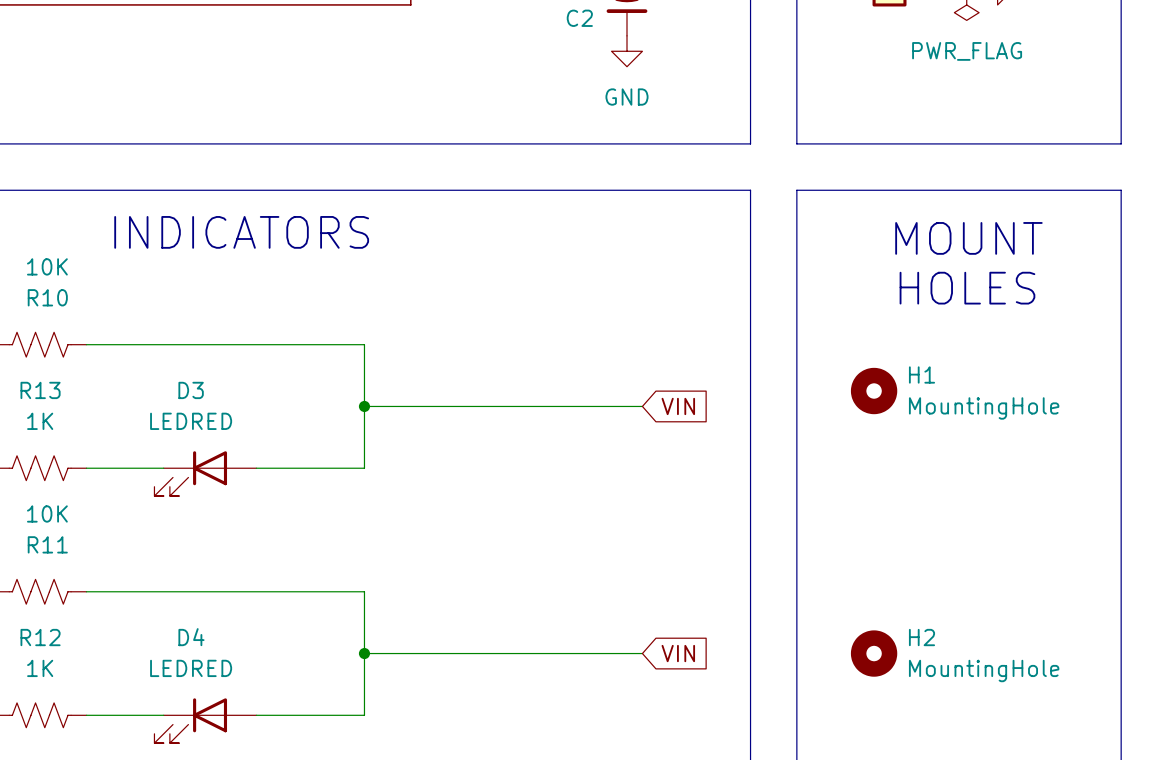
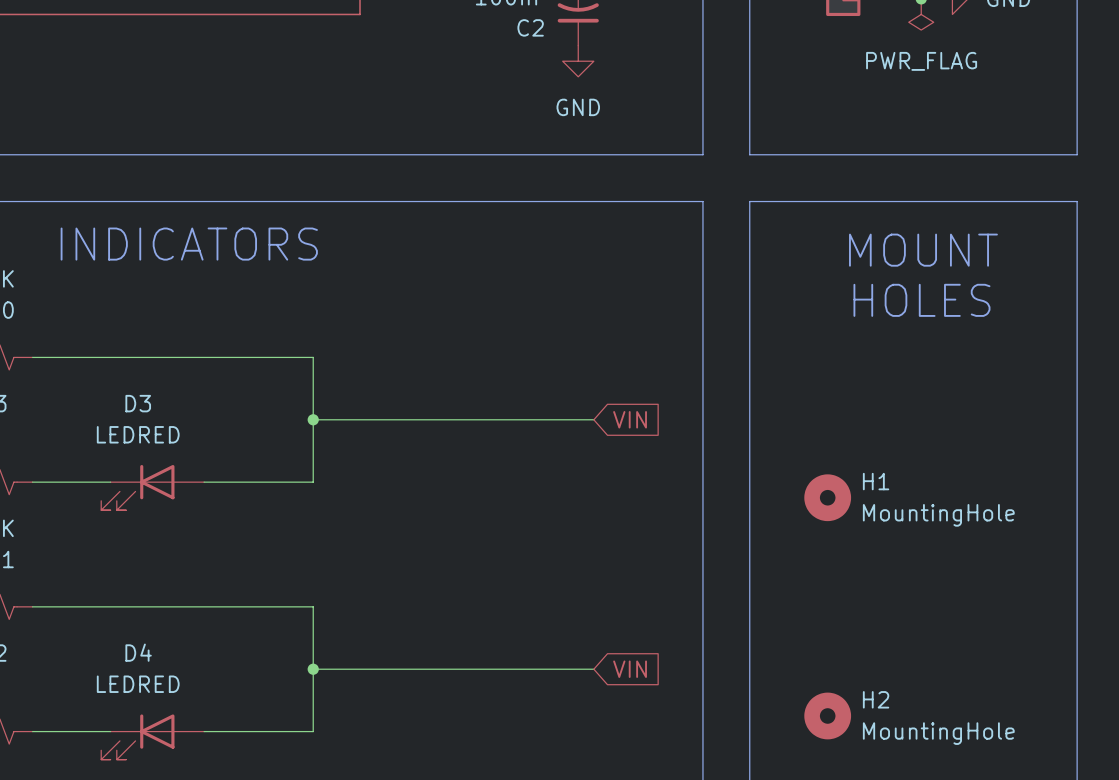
H1 position: (874, 391) -> (827, 497)
H2 position: (874, 653) -> (827, 715)

